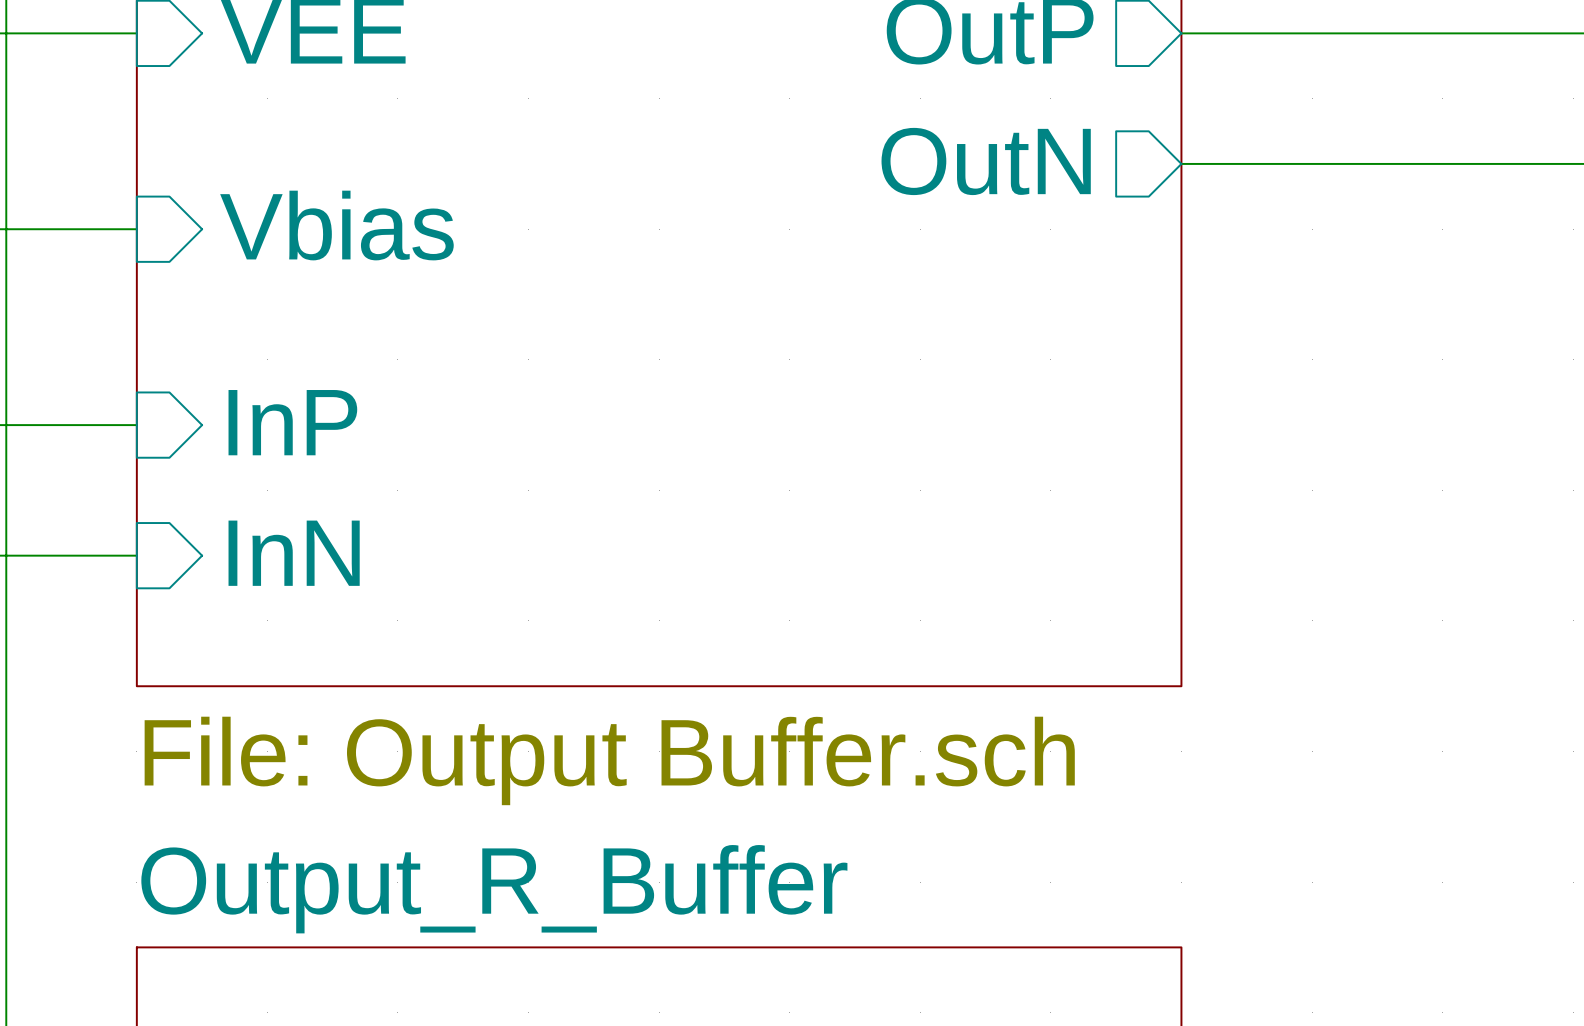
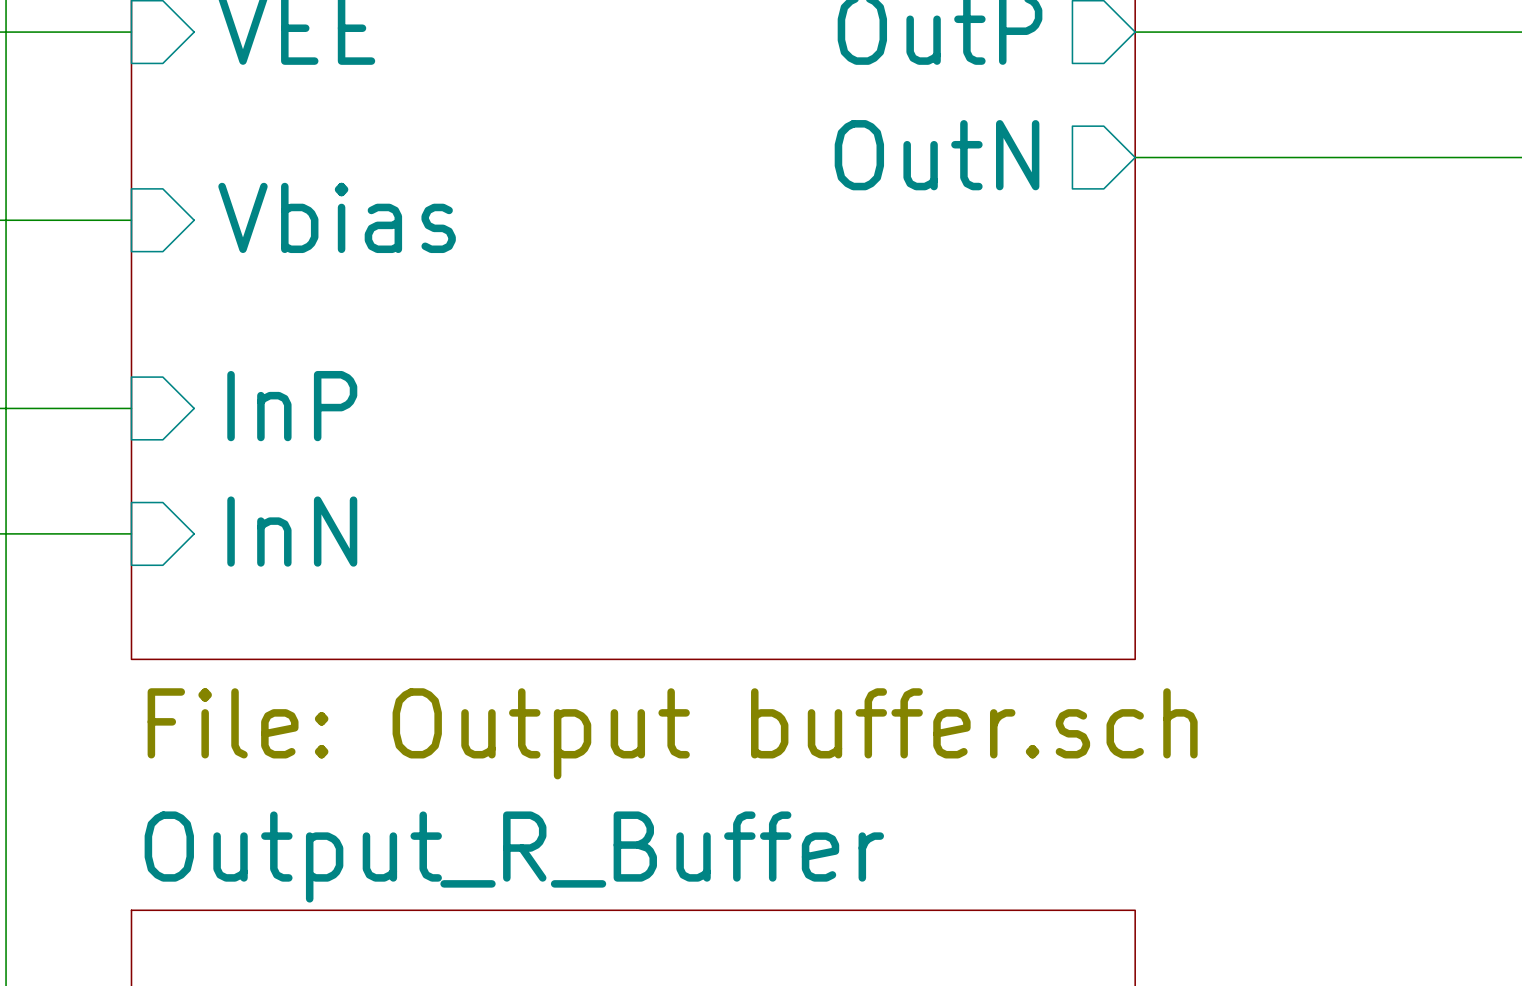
sheet value: File: Output Buffer.sch (609, 760) -> File: Output buffer.sch (672, 733)

